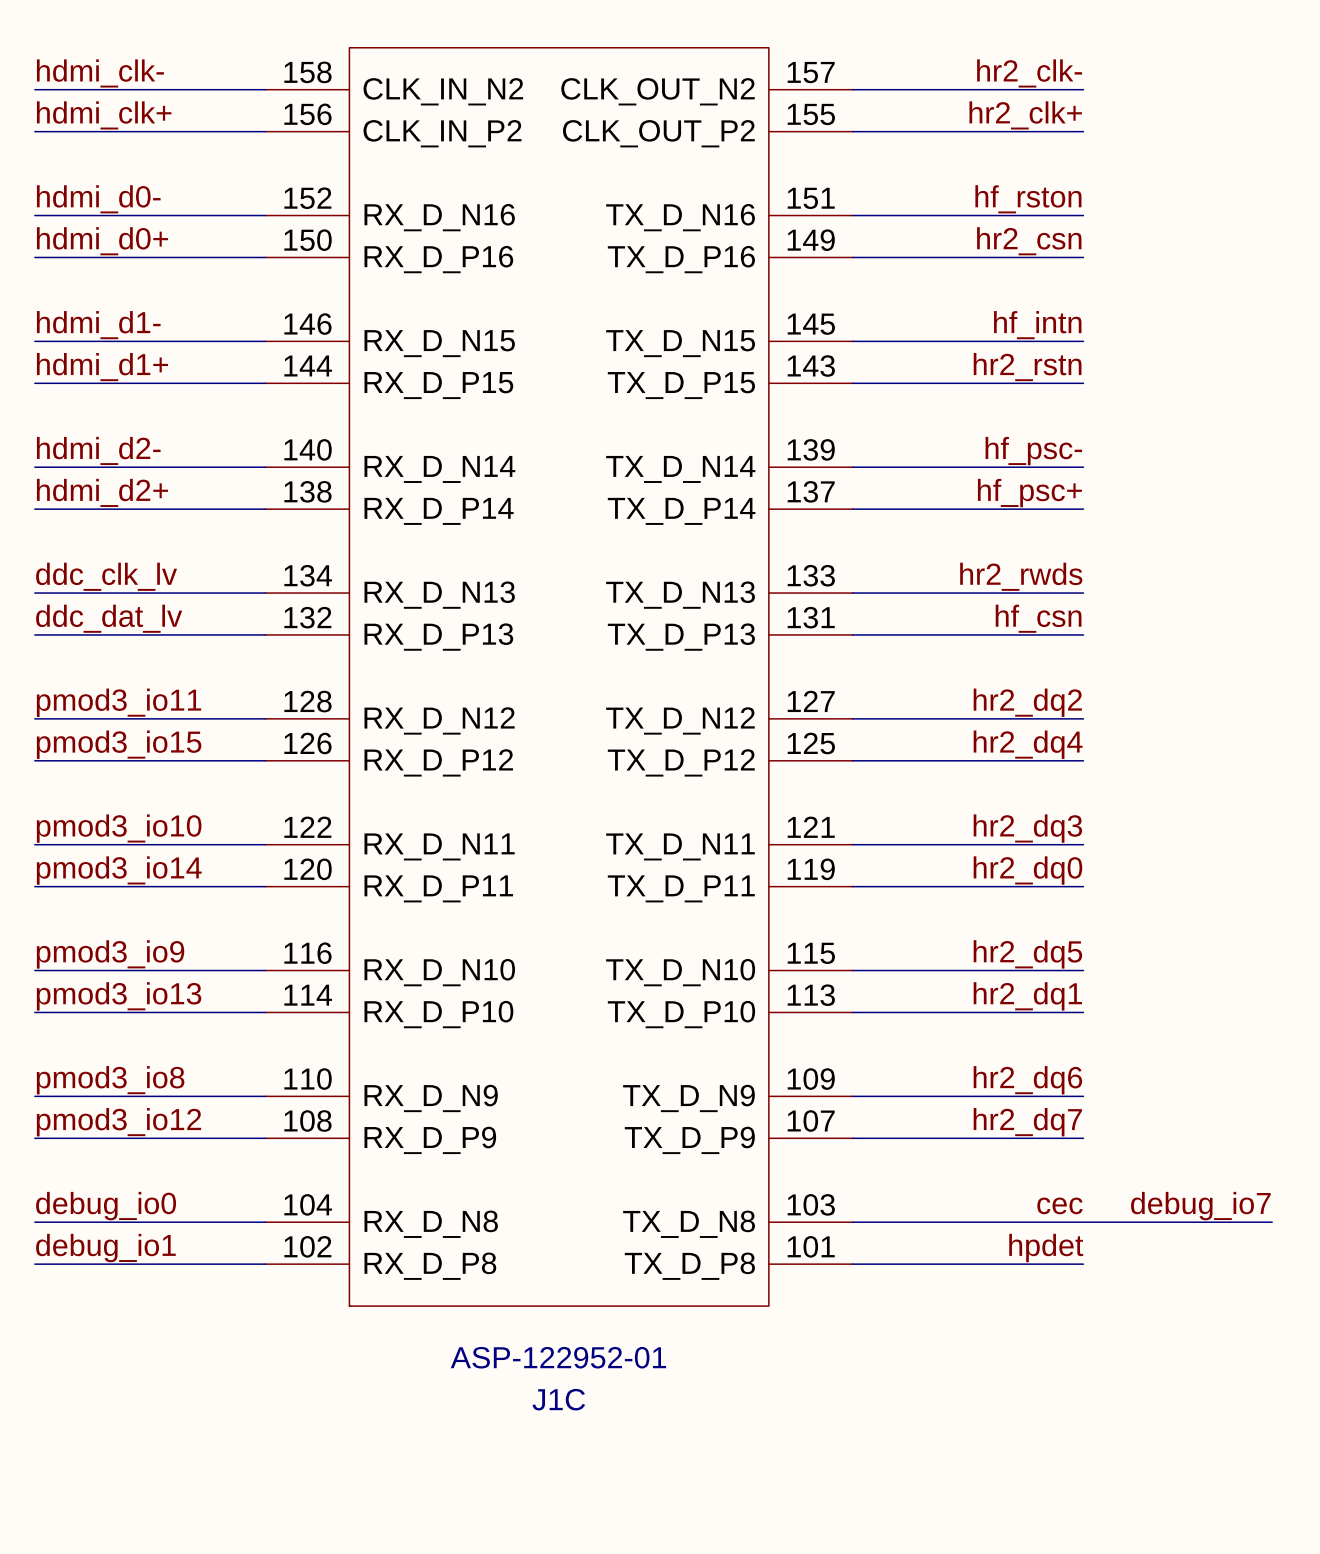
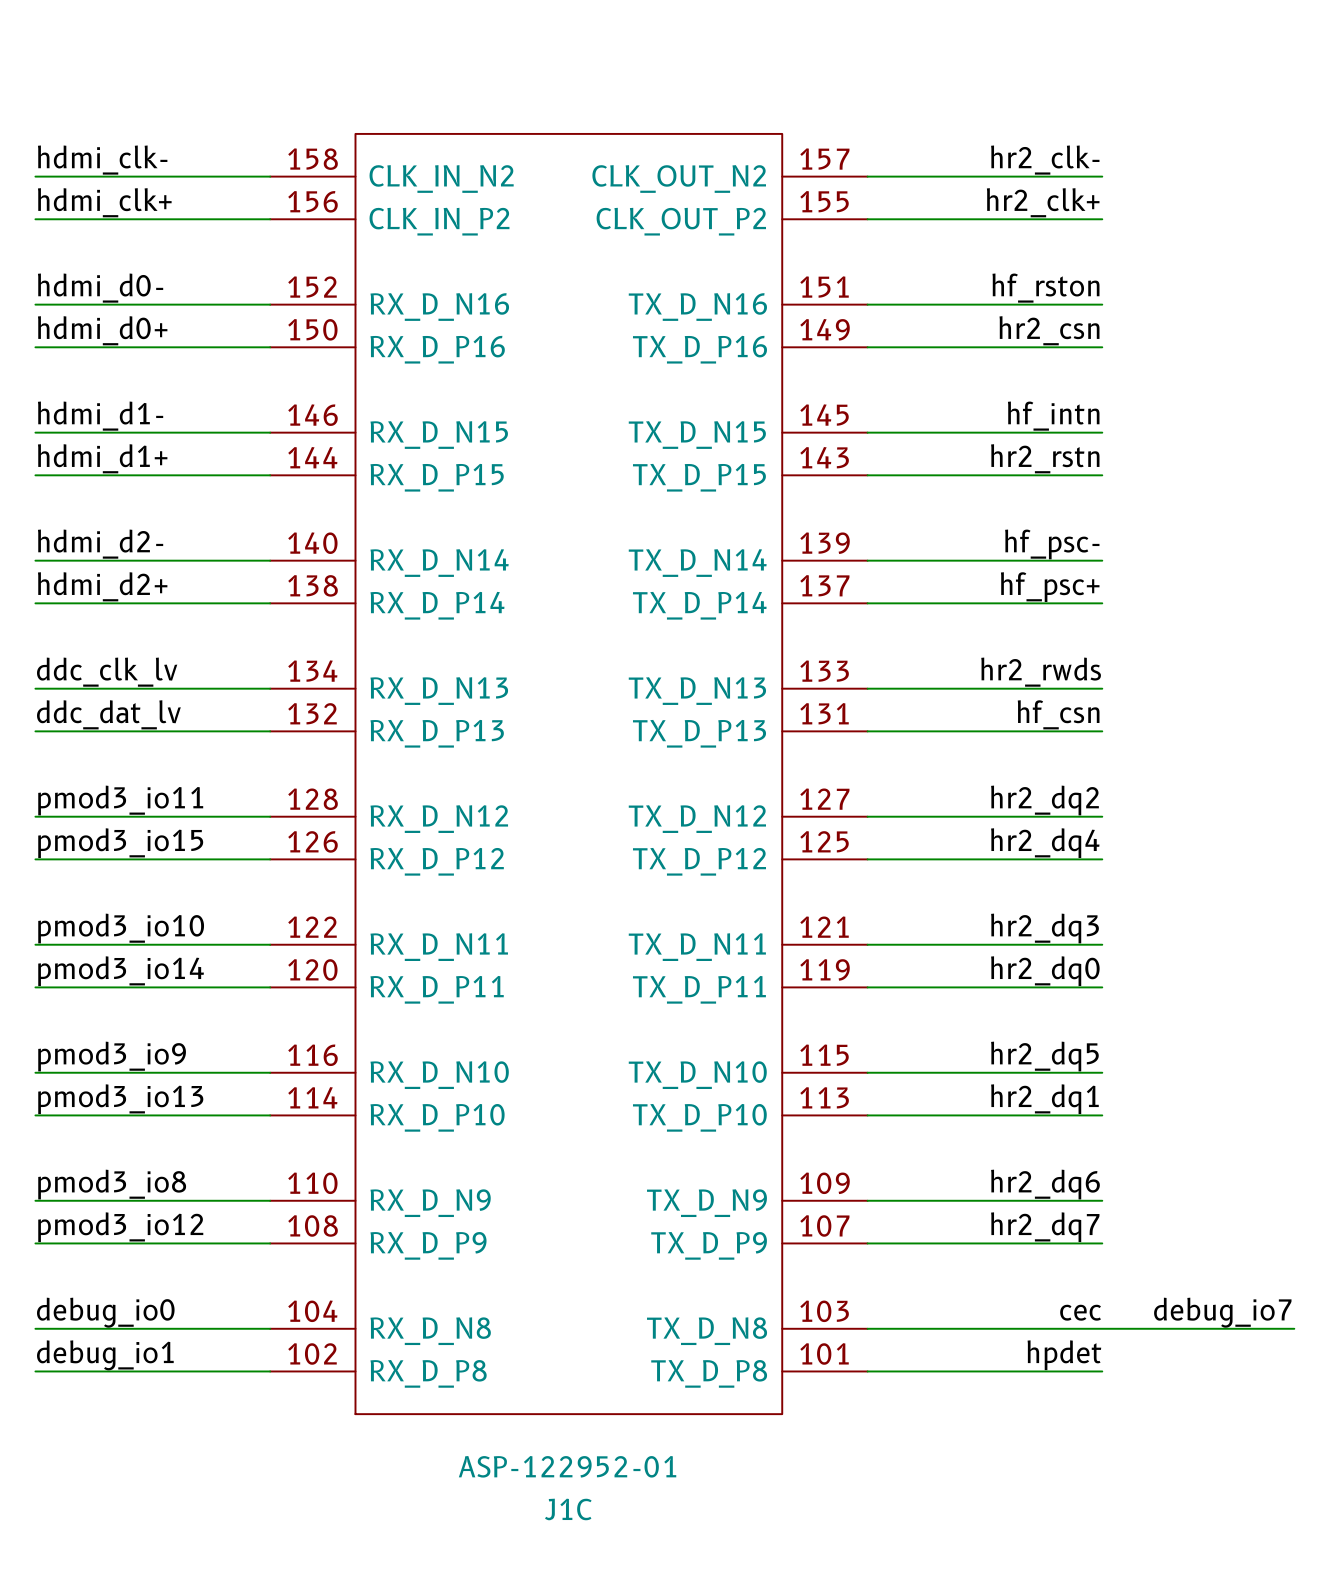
label position: hdmi_clk- (100, 73) -> hdmi_clk- (102, 160)
label position: hr2_clk- (1029, 73) -> hr2_clk- (1045, 160)
wire: (34, 89) (265, 89) -> none
wire: (852, 89) (1083, 89) -> none
label: hdmi_clk+ (104, 115) -> none
label: hr2_clk+ (1025, 115) -> none
wire: (34, 131) (265, 131) -> (35, 176) (270, 176)
wire: (852, 131) (1083, 131) -> (867, 176) (1102, 176)
label: hdmi_d0- (98, 199) -> hdmi_clk+ (104, 202)
label: hf_rston (1028, 199) -> hr2_clk+ (1043, 202)
label: hdmi_d0+ (102, 241) -> hdmi_d0- (100, 288)
label: hr2_csn (1029, 241) -> none
wire: (34, 257) (265, 257) -> (35, 304) (270, 304)
wire: (852, 257) (1083, 257) -> (867, 304) (1102, 304)
label: none -> hf_rston (1045, 288)
label: hdmi_d1- (98, 325) -> hdmi_d0+ (102, 330)
label: hf_intn (1037, 325) -> hr2_csn (1049, 330)
label: hdmi_d1+ (102, 367) -> hdmi_d1- (100, 416)
label: hr2_rstn (1027, 367) -> none
wire: (34, 383) (265, 383) -> (35, 432) (270, 432)
wire: (852, 383) (1083, 383) -> (867, 432) (1102, 432)
label: none -> hf_intn (1053, 416)
label: hdmi_d2- (98, 450) -> hdmi_d1+ (102, 458)
label: hf_psc- (1033, 451) -> hr2_rstn (1045, 458)
label: hdmi_d2+ (102, 492) -> hdmi_d2- (100, 544)
label: hf_psc+ (1029, 493) -> hf_psc- (1052, 544)
wire: (34, 509) (265, 509) -> (35, 560) (270, 560)
wire: (852, 509) (1083, 509) -> (867, 560) (1102, 560)
label: ddc_clk_lv (106, 576) -> hdmi_d2+ (102, 586)
label: hr2_rwds (1021, 576) -> hf_psc+ (1050, 587)
label: ddc_dat_lv (109, 618) -> ddc_clk_lv (107, 672)
label: hf_csn (1038, 618) -> none
wire: (34, 634) (265, 634) -> (35, 688) (270, 688)
wire: (852, 634) (1083, 634) -> (867, 688) (1102, 688)
label: none -> hr2_rwds (1041, 672)
J1C position: (559, 676) -> (568, 774)
label: pmod3_io11 (118, 702) -> ddc_dat_lv (108, 714)
label: hr2_dq2 (1027, 702) -> hf_csn (1058, 714)
label: pmod3_io15 (119, 744) -> pmod3_io11 (120, 800)
label: hr2_dq4 (1028, 744) -> hr2_dq2 (1044, 800)
wire: (34, 760) (265, 760) -> (35, 816) (270, 816)
wire: (852, 760) (1083, 760) -> (867, 816) (1102, 816)
label: pmod3_io10 (119, 828) -> pmod3_io15 (120, 843)
label: hr2_dq3 (1027, 828) -> hr2_dq4 (1045, 843)
label: pmod3_io14 (119, 870) -> pmod3_io10 (121, 928)
label: hr2_dq0 (1027, 870) -> hr2_dq3 (1044, 928)
wire: (34, 886) (265, 886) -> (35, 944) (270, 944)
wire: (852, 886) (1083, 886) -> (867, 944) (1102, 944)
label: pmod3_io9 (110, 954) -> pmod3_io14 (121, 971)
label: hr2_dq5 (1027, 954) -> hr2_dq0 (1045, 971)
label: pmod3_io13 (119, 996) -> pmod3_io9 (112, 1056)
label: hr2_dq1 (1027, 996) -> hr2_dq5 (1044, 1056)
wire: (34, 1012) (265, 1012) -> (35, 1072) (270, 1072)
wire: (852, 1012) (1083, 1012) -> (867, 1072) (1102, 1072)
label: pmod3_io8 (110, 1080) -> pmod3_io13 (120, 1099)
label: hr2_dq6 (1027, 1080) -> hr2_dq1 (1044, 1099)
label: pmod3_io12 (118, 1122) -> pmod3_io8 (112, 1184)
label: hr2_dq7 (1027, 1122) -> hr2_dq6 (1045, 1184)
wire: (34, 1138) (265, 1138) -> (35, 1200) (270, 1200)
wire: (852, 1138) (1083, 1138) -> (867, 1200) (1102, 1200)
label: cec (1059, 1205) -> hr2_dq7 (1045, 1227)
label: debug_io0 (106, 1206) -> pmod3_io12 (120, 1227)
label position: debug_io7 (1200, 1206) -> debug_io7 (1222, 1312)
wire: (1083, 1222) (1272, 1222) -> none
label position: debug_io1 (105, 1248) -> debug_io1 (105, 1355)
label position: hpdet (1046, 1248) -> hpdet (1064, 1355)
wire: (34, 1264) (265, 1264) -> (35, 1328) (270, 1328)
wire: (852, 1264) (1083, 1264) -> (867, 1371) (1102, 1371)
label: none -> debug_io0 (105, 1312)
label: none -> cec (1080, 1312)
wire: none -> (867, 1328) (1294, 1328)
wire: none -> (35, 1371) (270, 1371)

